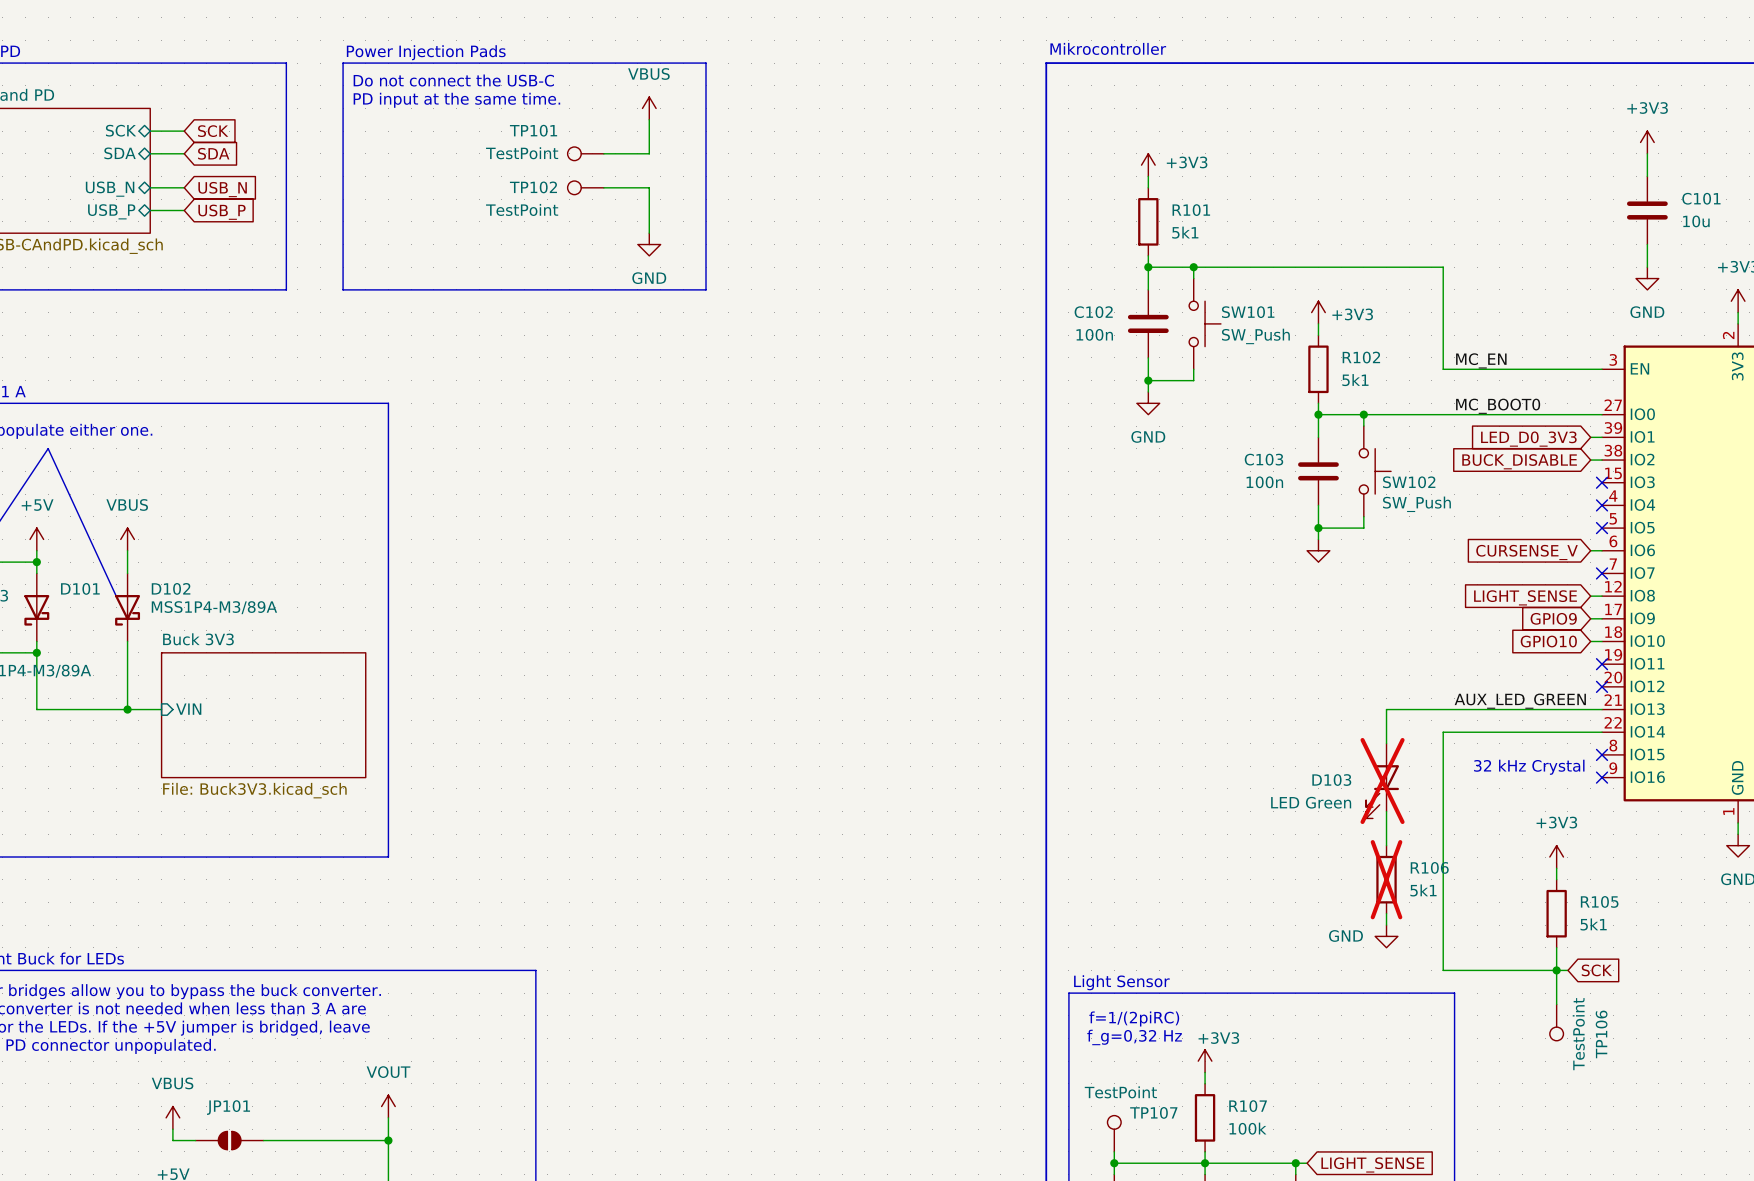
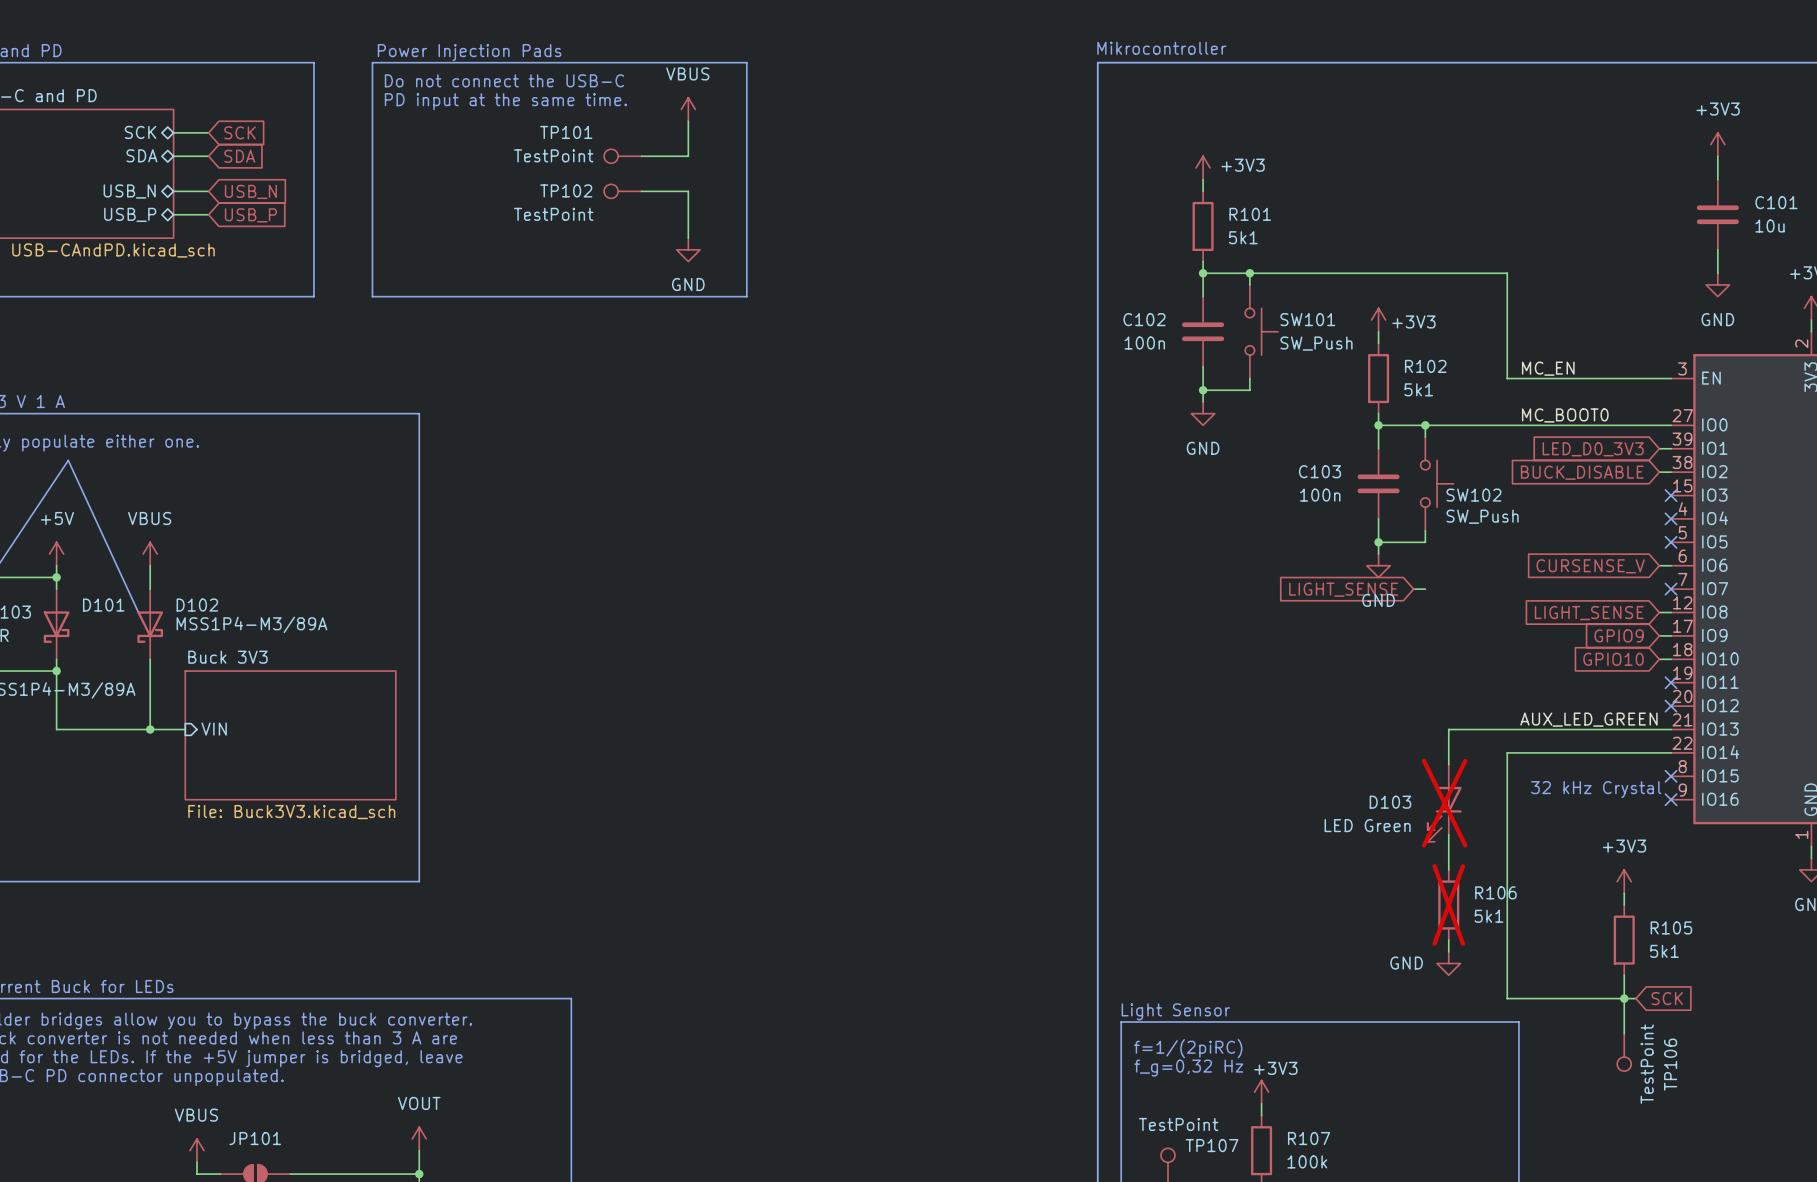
wire: none -> (1413, 589) (1425, 589)
global label: none -> LIGHT_SENSE (1343, 589)
power symbol text: none -> GND (1378, 600)

